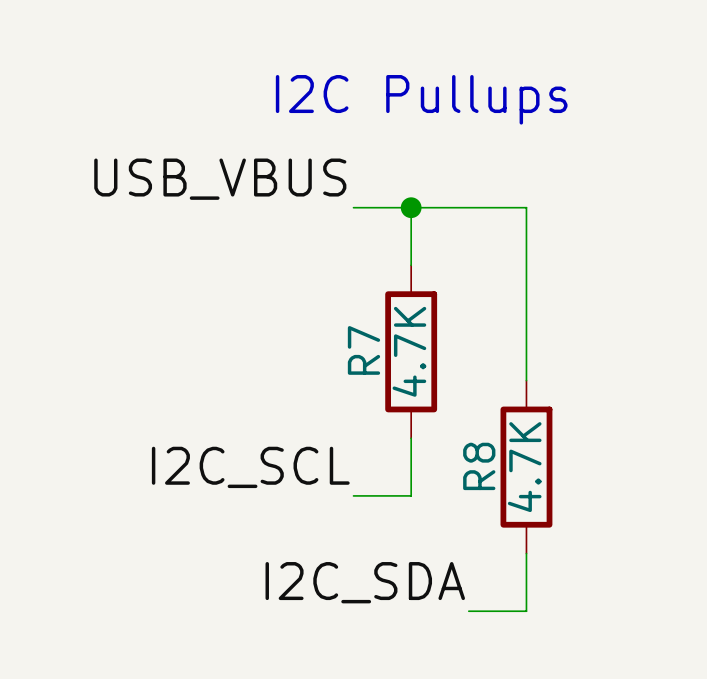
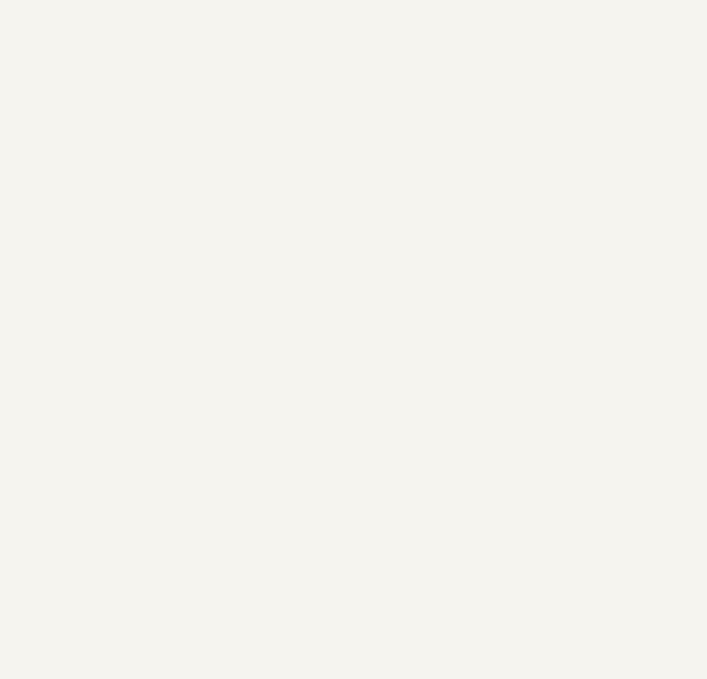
text: I2C Pullups (421, 99) -> none
label: USB_VBUS (220, 179) -> none
wire: (353, 207) (526, 207) (526, 380) -> none
wire: (411, 207) (411, 265) -> none
junction: (411, 207) -> none
R7: 4.7K (411, 351) -> none
wire: (411, 438) (411, 495) (353, 495) -> none
label: I2C_SCL (250, 467) -> none
R8: 4.7K (526, 467) -> none
wire: (526, 553) (526, 611) (468, 611) -> none
label: I2C_SDA (365, 582) -> none

